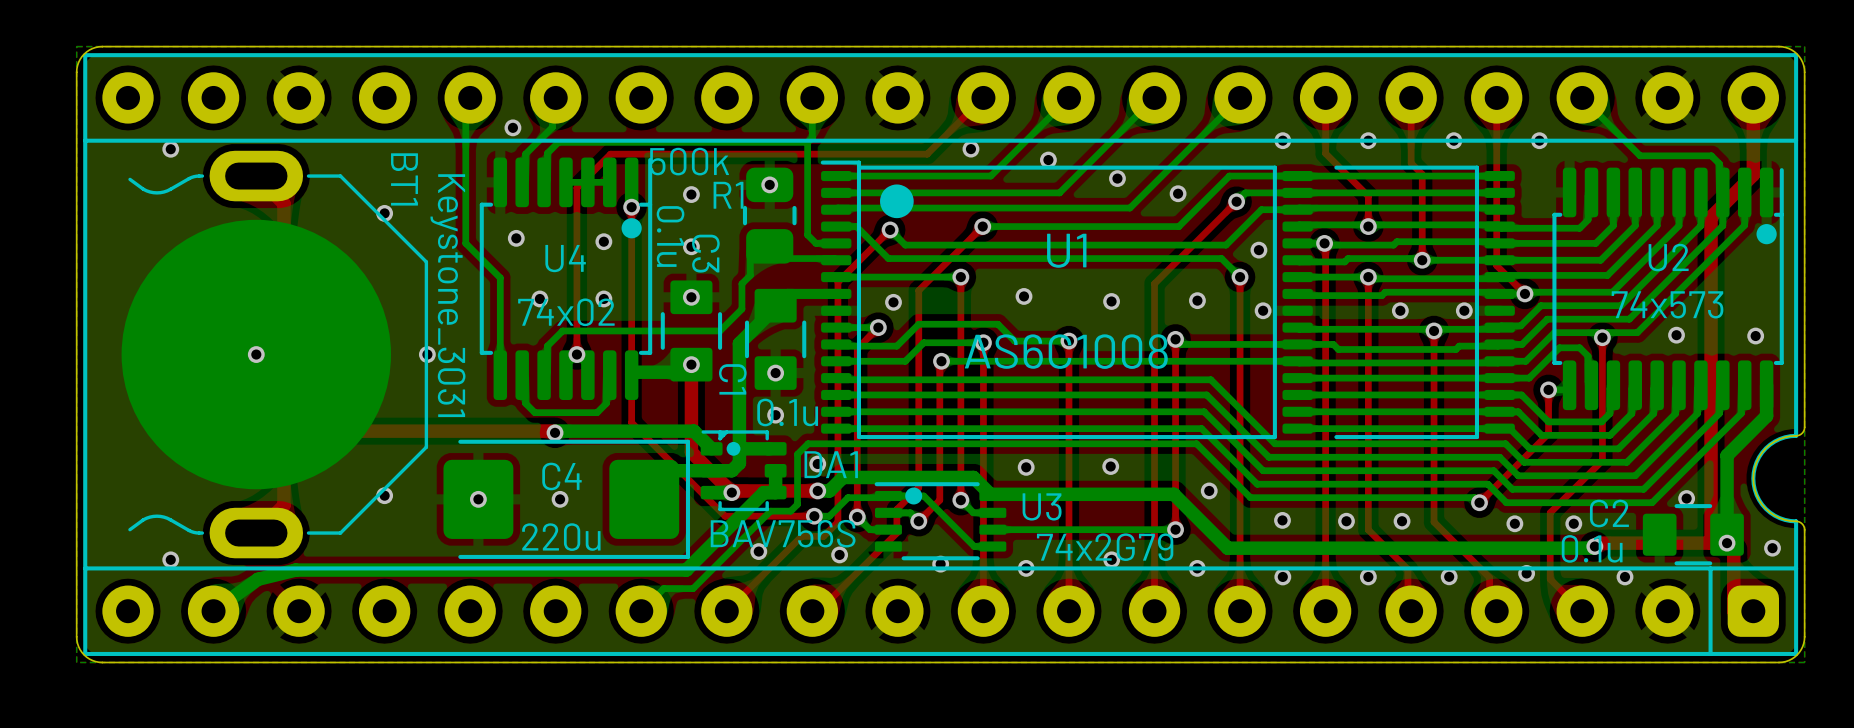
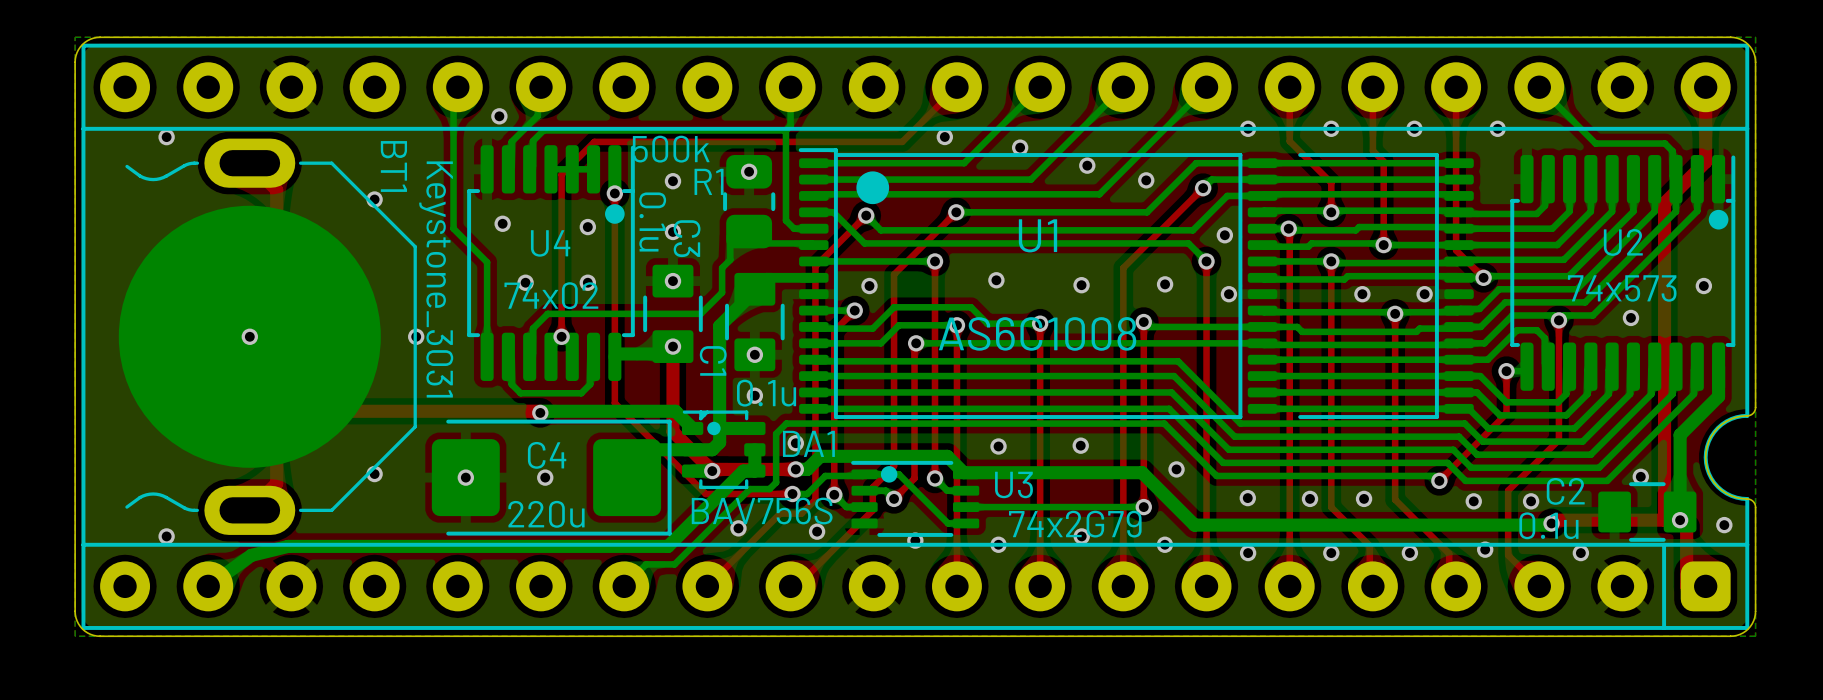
via position: (1755, 336) -> (1703, 286)

